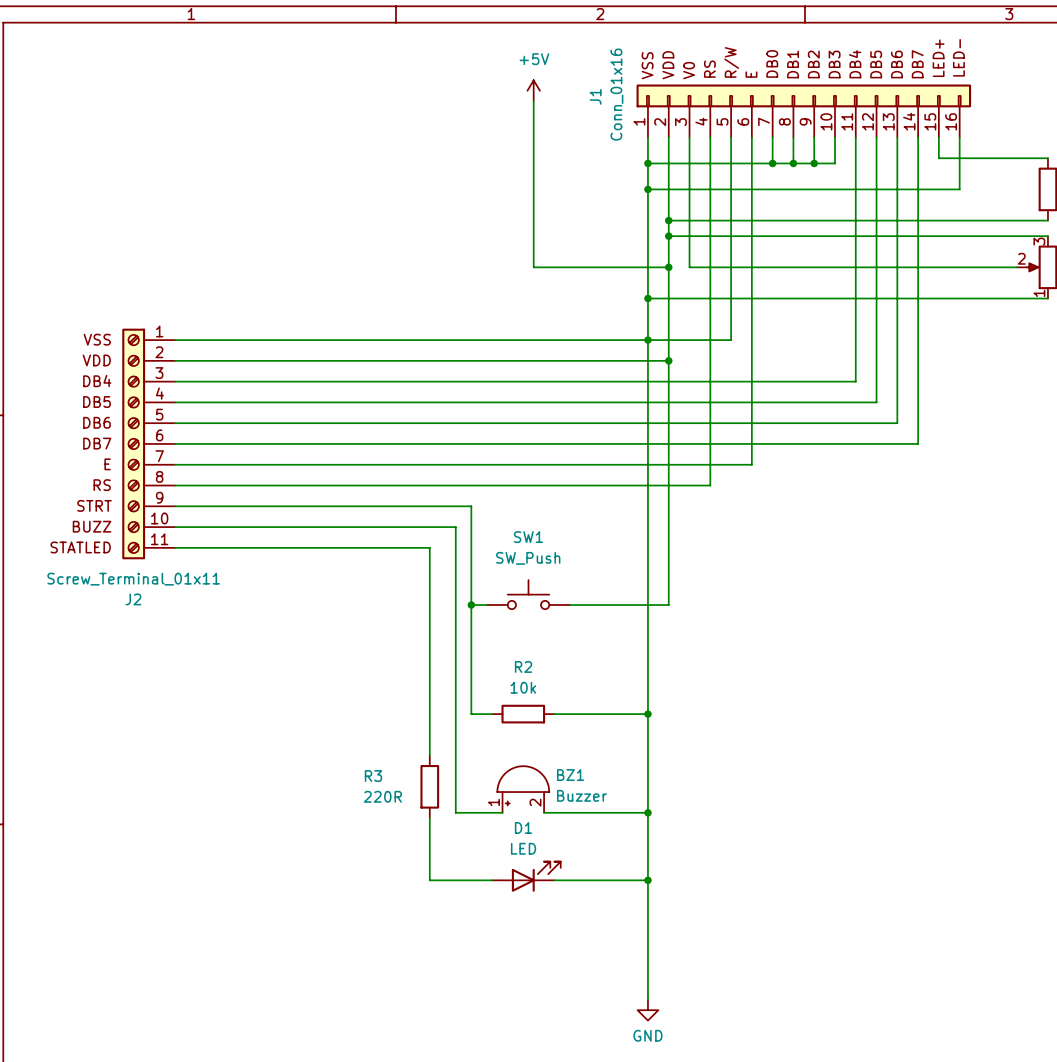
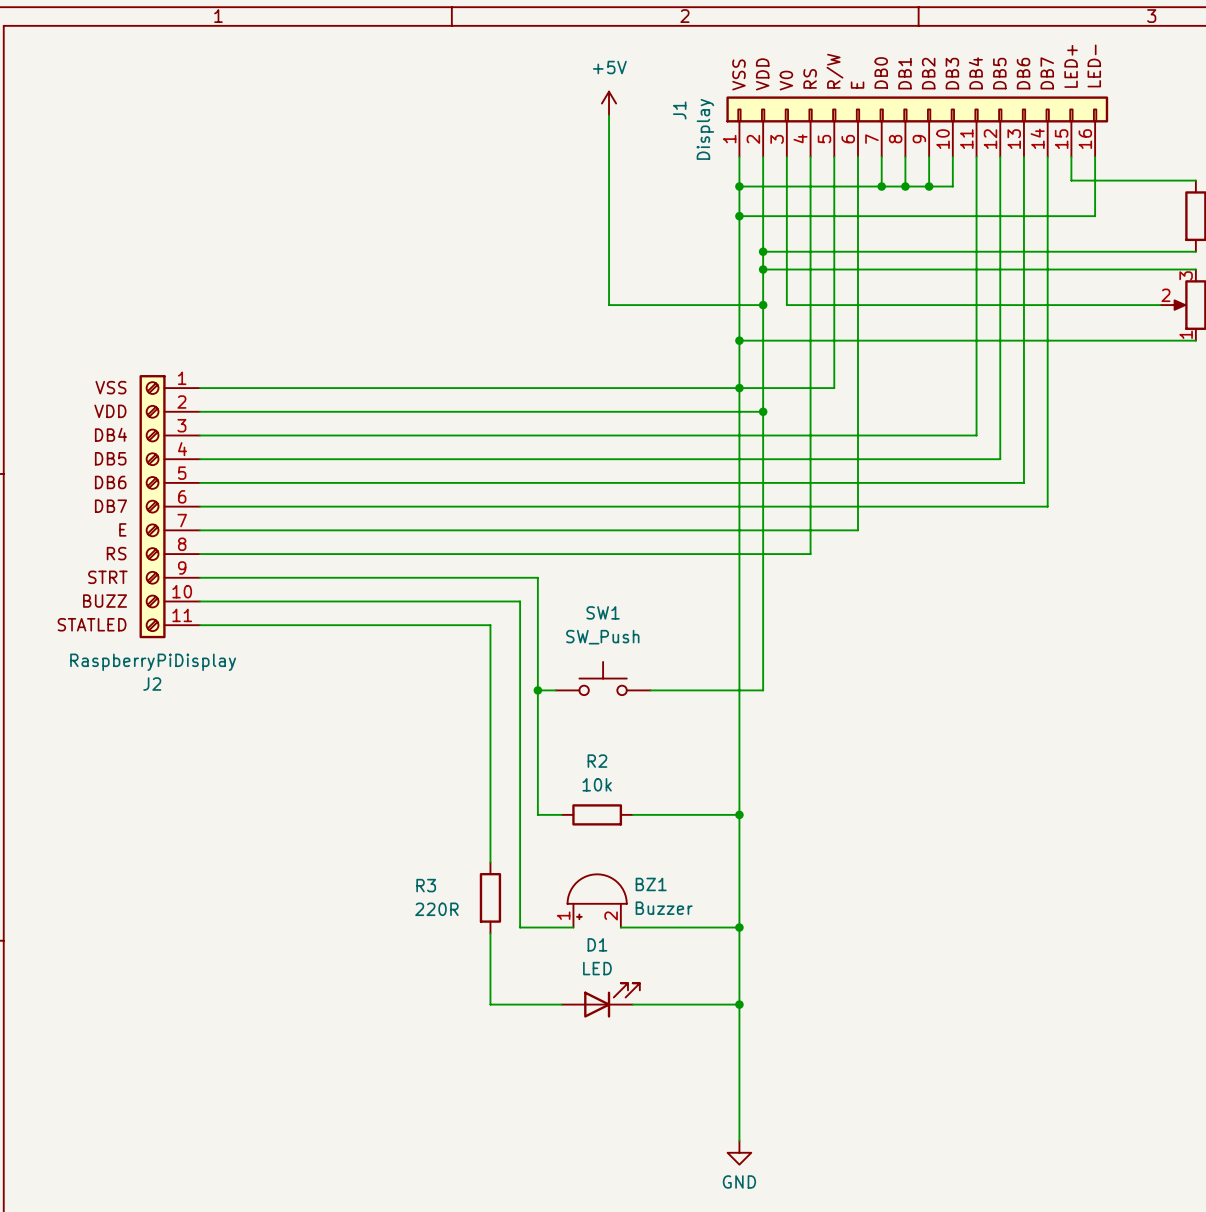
J1 value: Conn_01x16 (616, 94) -> Display (705, 129)
J2 value: Screw_Terminal_01x11 (133, 579) -> RaspberryPiDisplay (153, 662)

